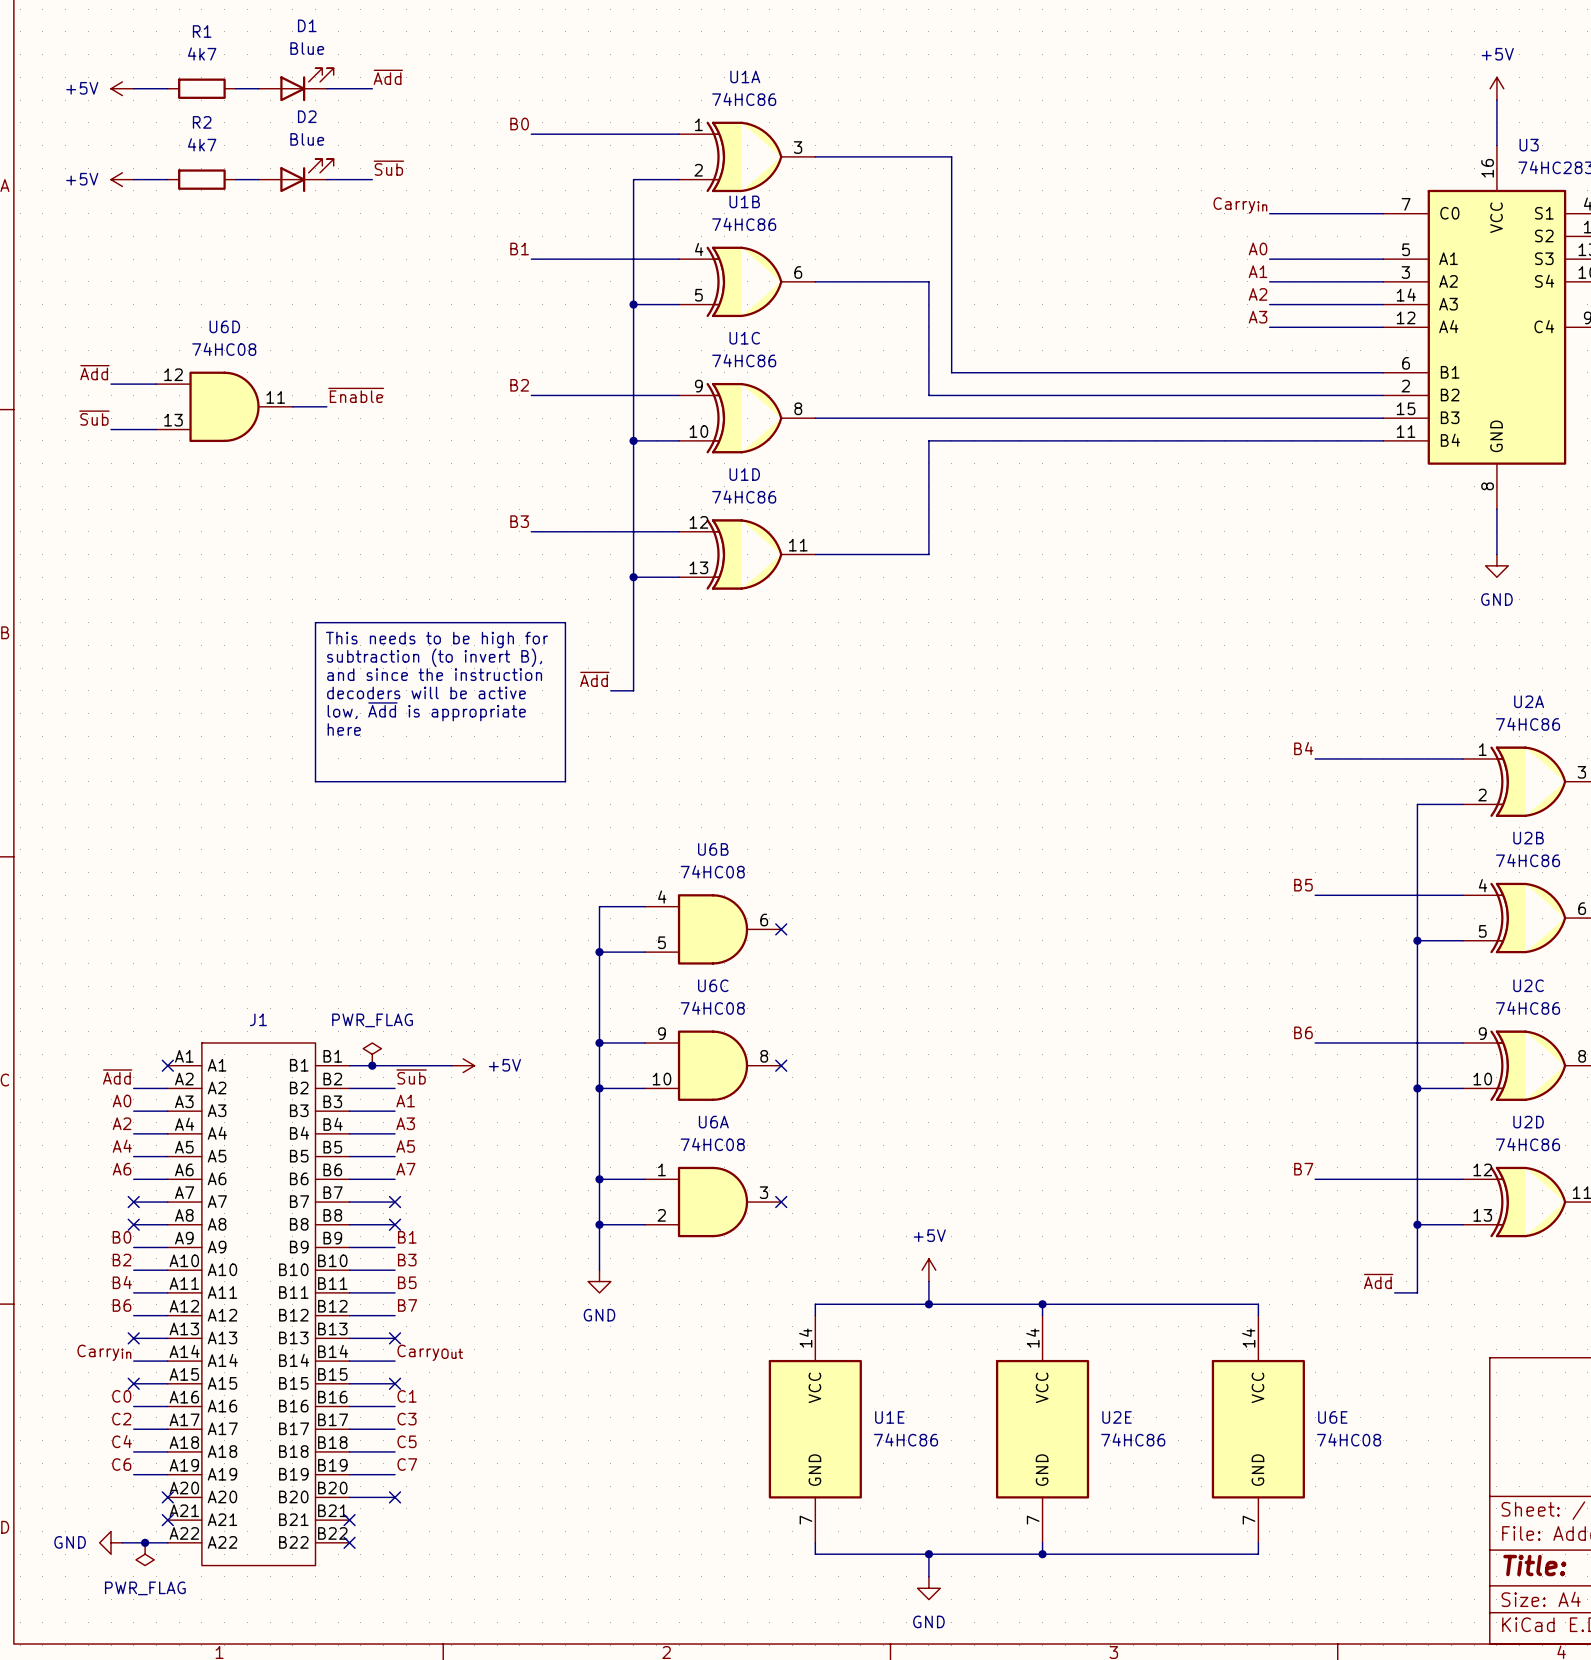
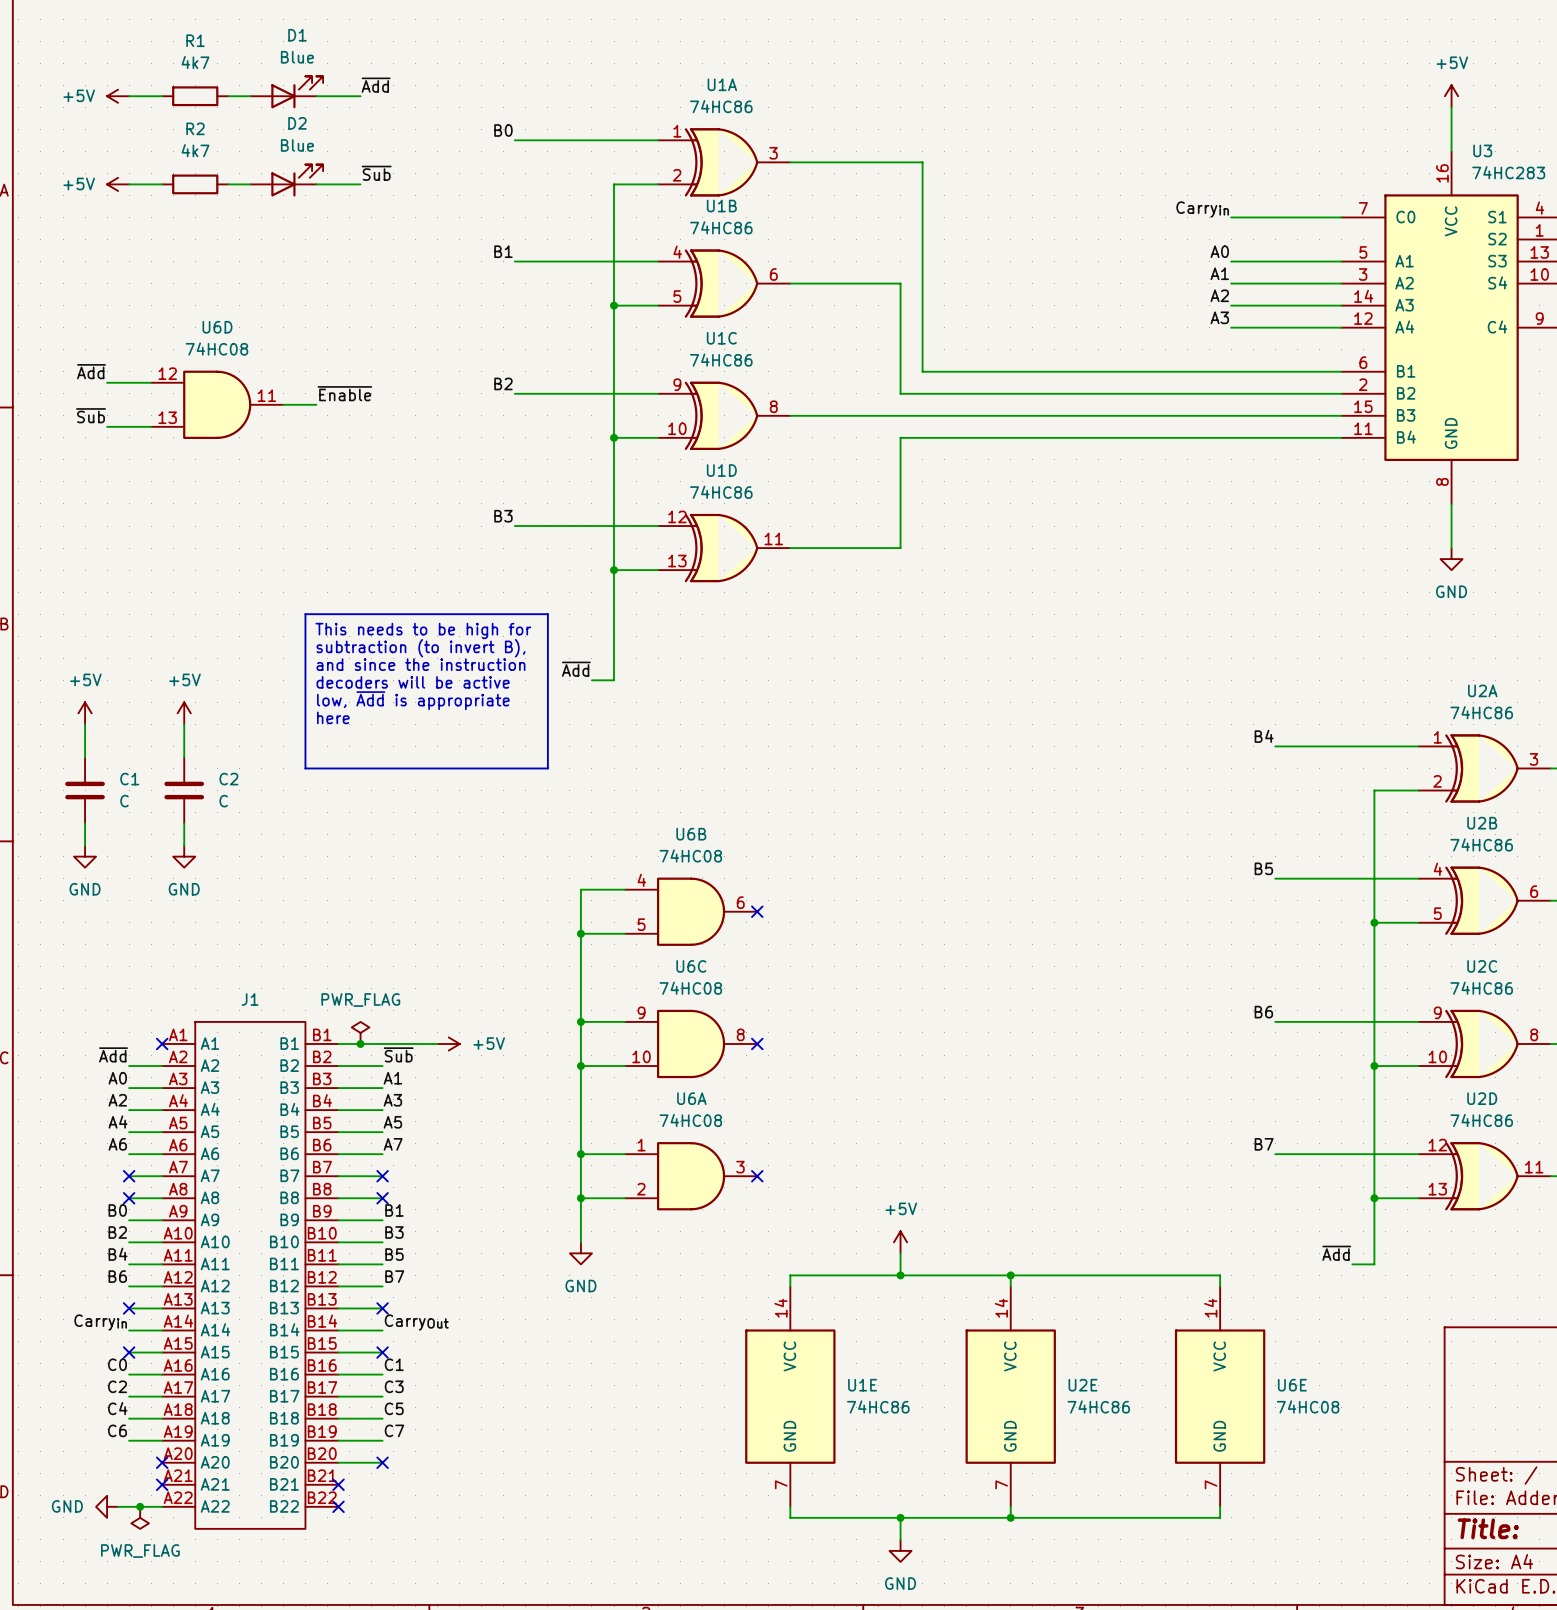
power symbol: none -> +5V (85, 713)
power symbol: none -> +5V (184, 713)
wire: none -> (85, 724) (85, 757)
wire: none -> (184, 724) (184, 757)
C1: none -> C (85, 790)
C2: none -> C (184, 790)
wire: none -> (85, 823) (85, 845)
wire: none -> (184, 823) (184, 845)
power symbol: none -> GND (85, 856)
power symbol: none -> GND (184, 856)

